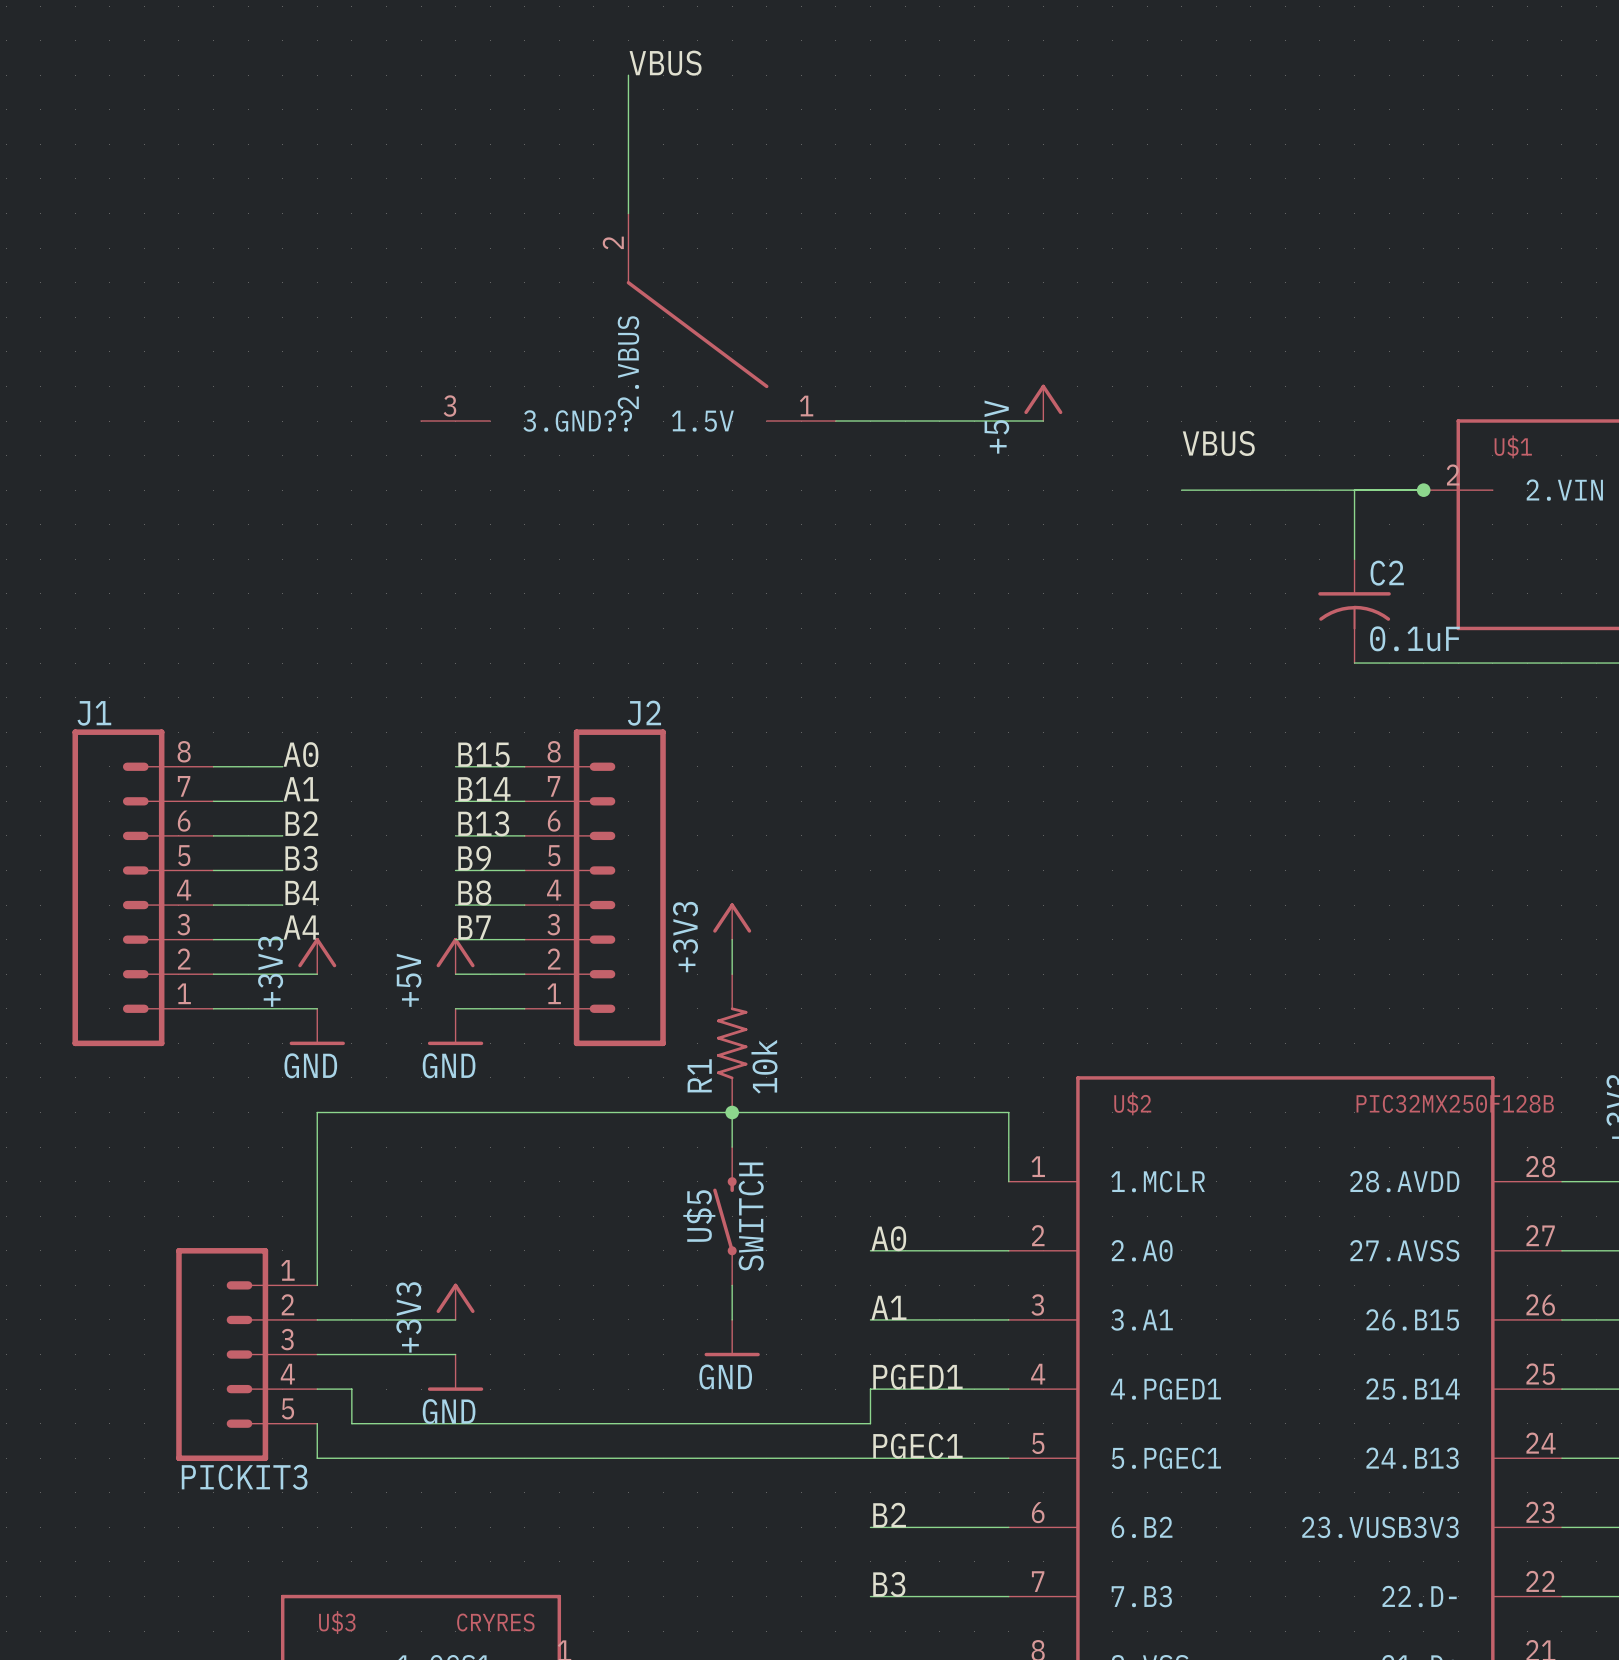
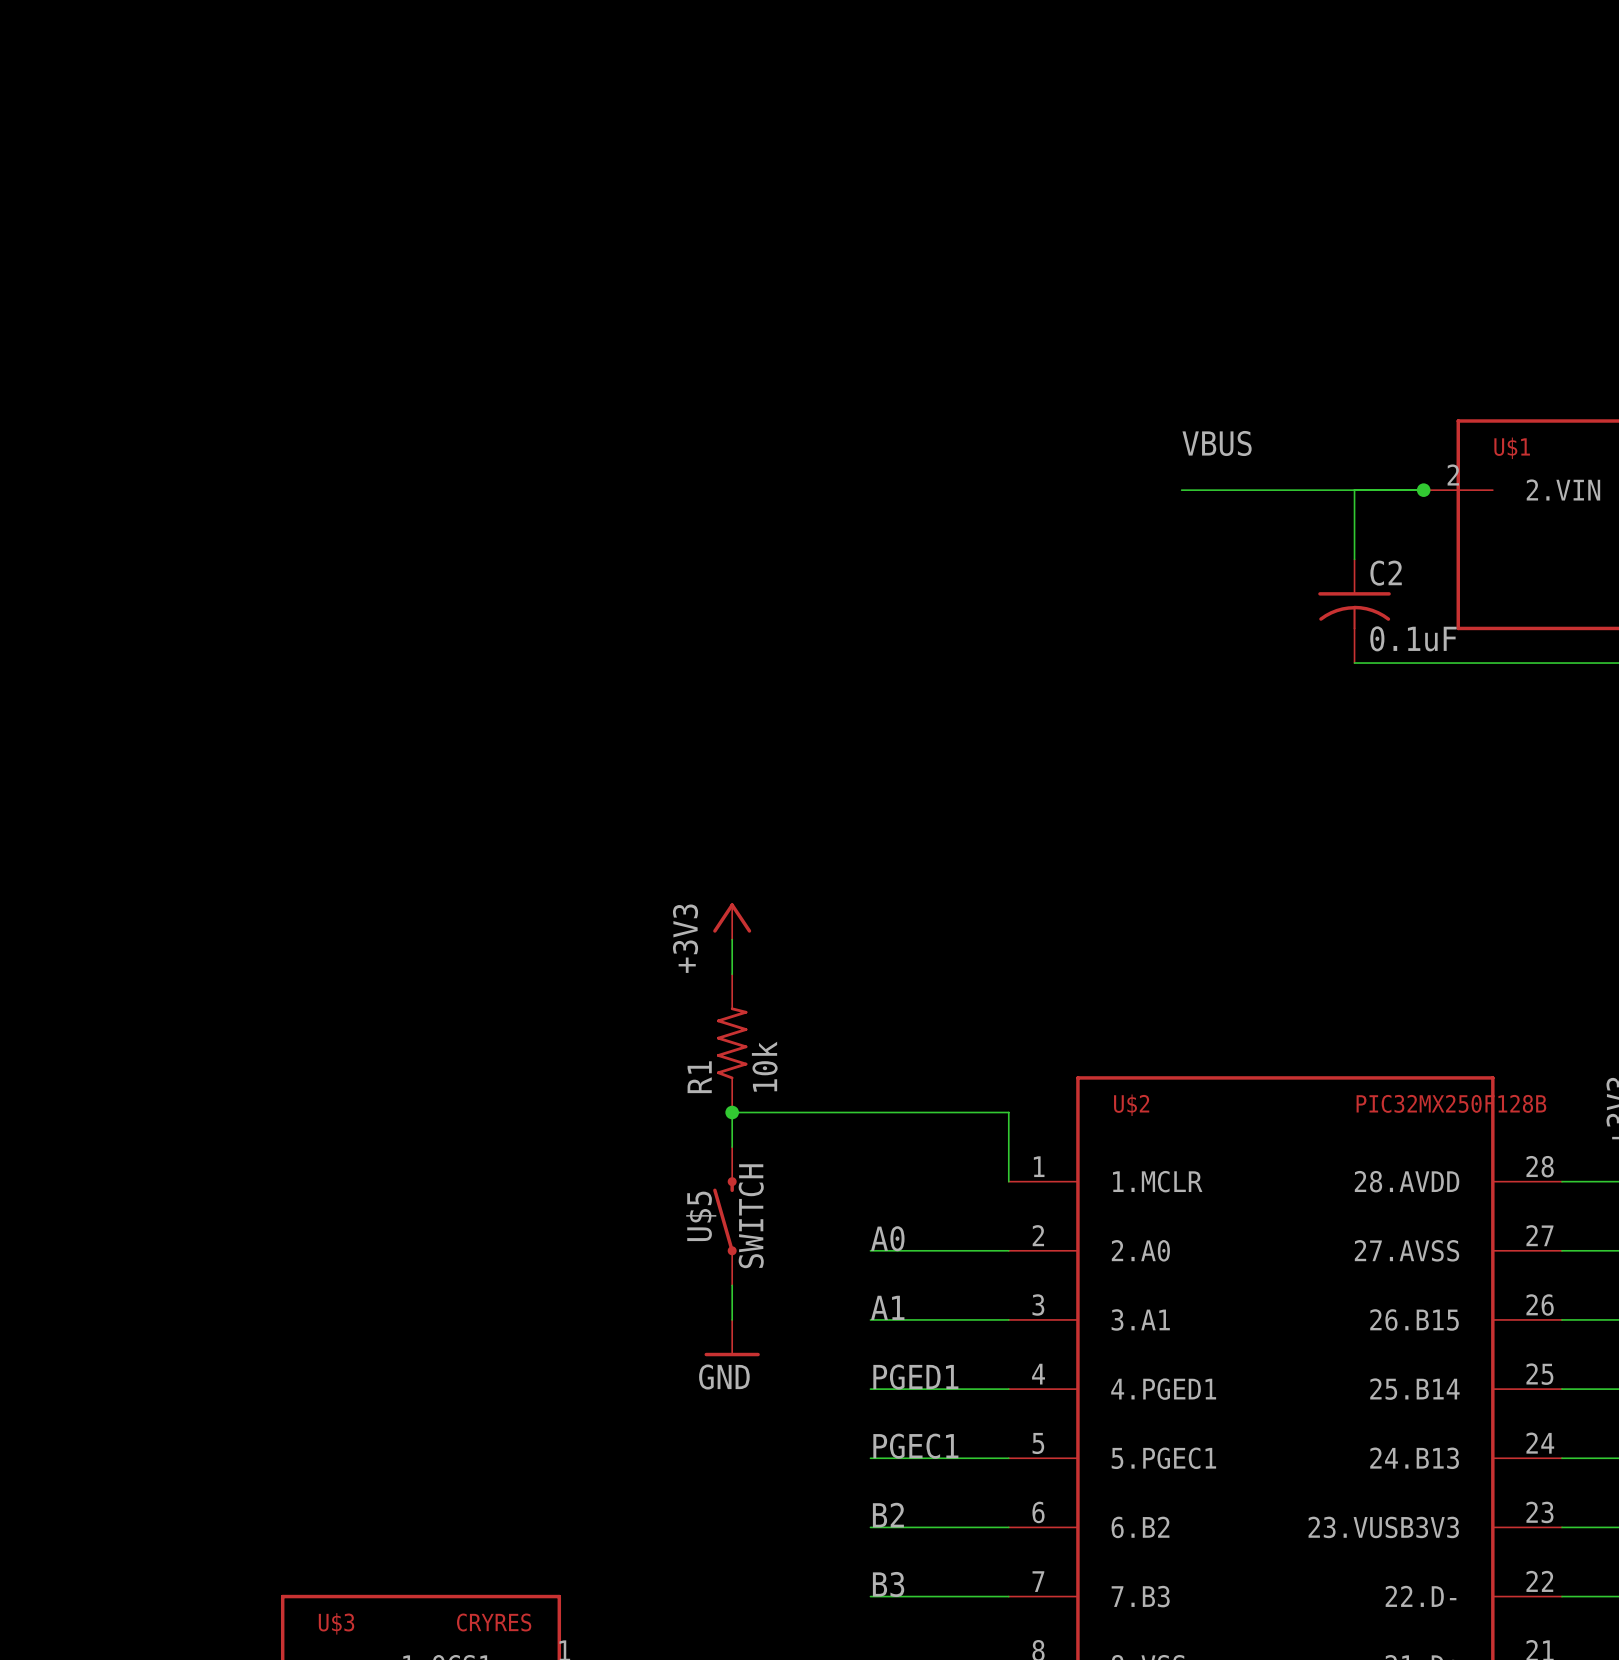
label: VBUS (665, 63) -> none
wire: (628, 75) (628, 213) -> none
part: (628, 317) -> none
power symbol: +5V (1043, 402) -> none
wire: (835, 421) (1043, 421) -> none
label: A0 (301, 754) -> none
label: B15 (483, 754) -> none
wire: (213, 766) (282, 766) -> none
wire: (455, 766) (524, 766) -> none
label: A1 (301, 789) -> none
label: B14 (484, 789) -> none
wire: (213, 801) (282, 801) -> none
wire: (455, 801) (524, 801) -> none
label: B2 (301, 823) -> none
label: B13 (483, 823) -> none
wire: (213, 835) (282, 835) -> none
wire: (455, 835) (524, 835) -> none
label: B3 (301, 858) -> none
label: B9 (474, 858) -> none
wire: (213, 870) (282, 870) -> none
wire: (455, 870) (524, 870) -> none
J1: (143, 887) -> none
J2: (595, 887) -> none
label: B4 (302, 892) -> none
label: B8 (474, 892) -> none
wire: (213, 905) (282, 905) -> none
wire: (455, 905) (524, 905) -> none
label: A4 (301, 927) -> none
label: B7 (474, 927) -> none
wire: (213, 939) (282, 939) -> none
wire: (455, 939) (524, 939) -> none
power symbol: +3V3 (317, 956) -> none
power symbol: +5V (455, 956) -> none
wire: (213, 974) (317, 974) -> none
wire: (455, 974) (524, 974) -> none
wire: (213, 1008) (317, 1008) -> none
wire: (455, 1008) (524, 1008) -> none
power symbol: GND (317, 1026) -> none
power symbol: GND (455, 1026) -> none
wire: (732, 1112) (317, 1112) (317, 1285) -> none
power symbol: +3V3 (455, 1301) -> none
wire: (317, 1319) (455, 1319) -> none
PICKIT3: (246, 1354) -> none
wire: (317, 1354) (455, 1354) -> none
power symbol: GND (455, 1372) -> none
wire: (317, 1389) (351, 1389) (351, 1423) (870, 1423) (870, 1389) -> none
wire: (317, 1423) (317, 1458) (870, 1458) -> none

